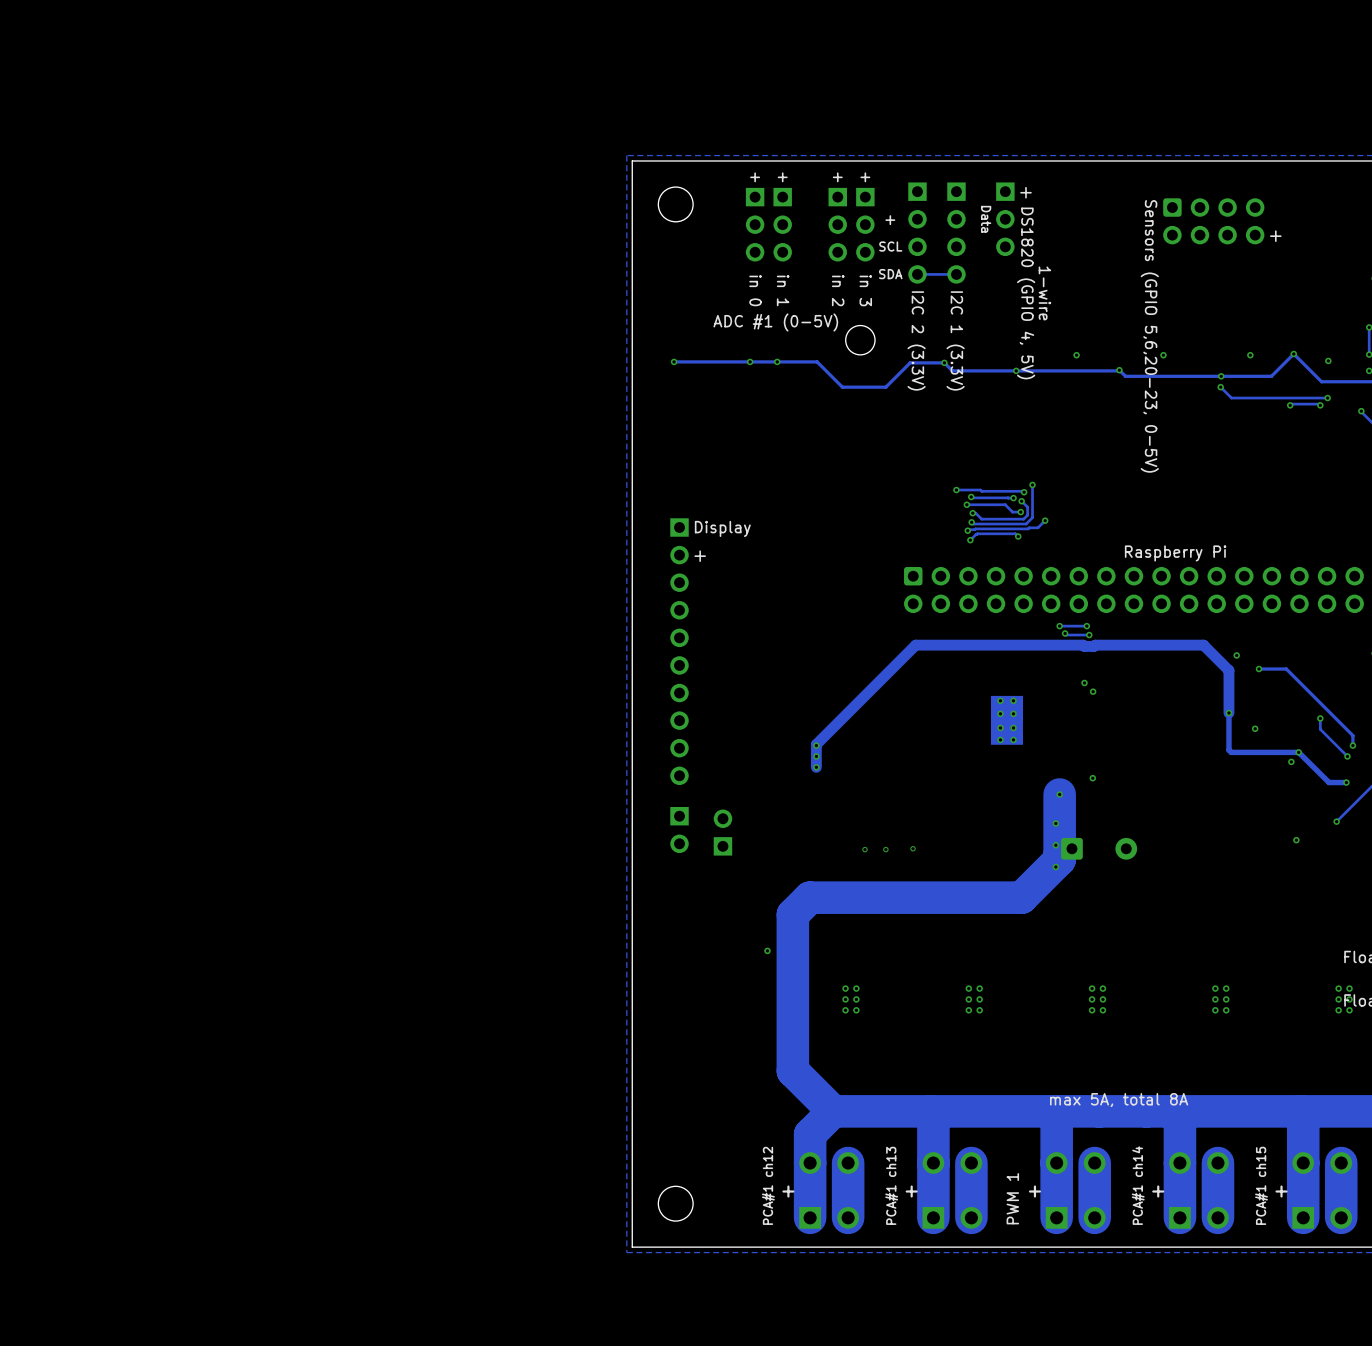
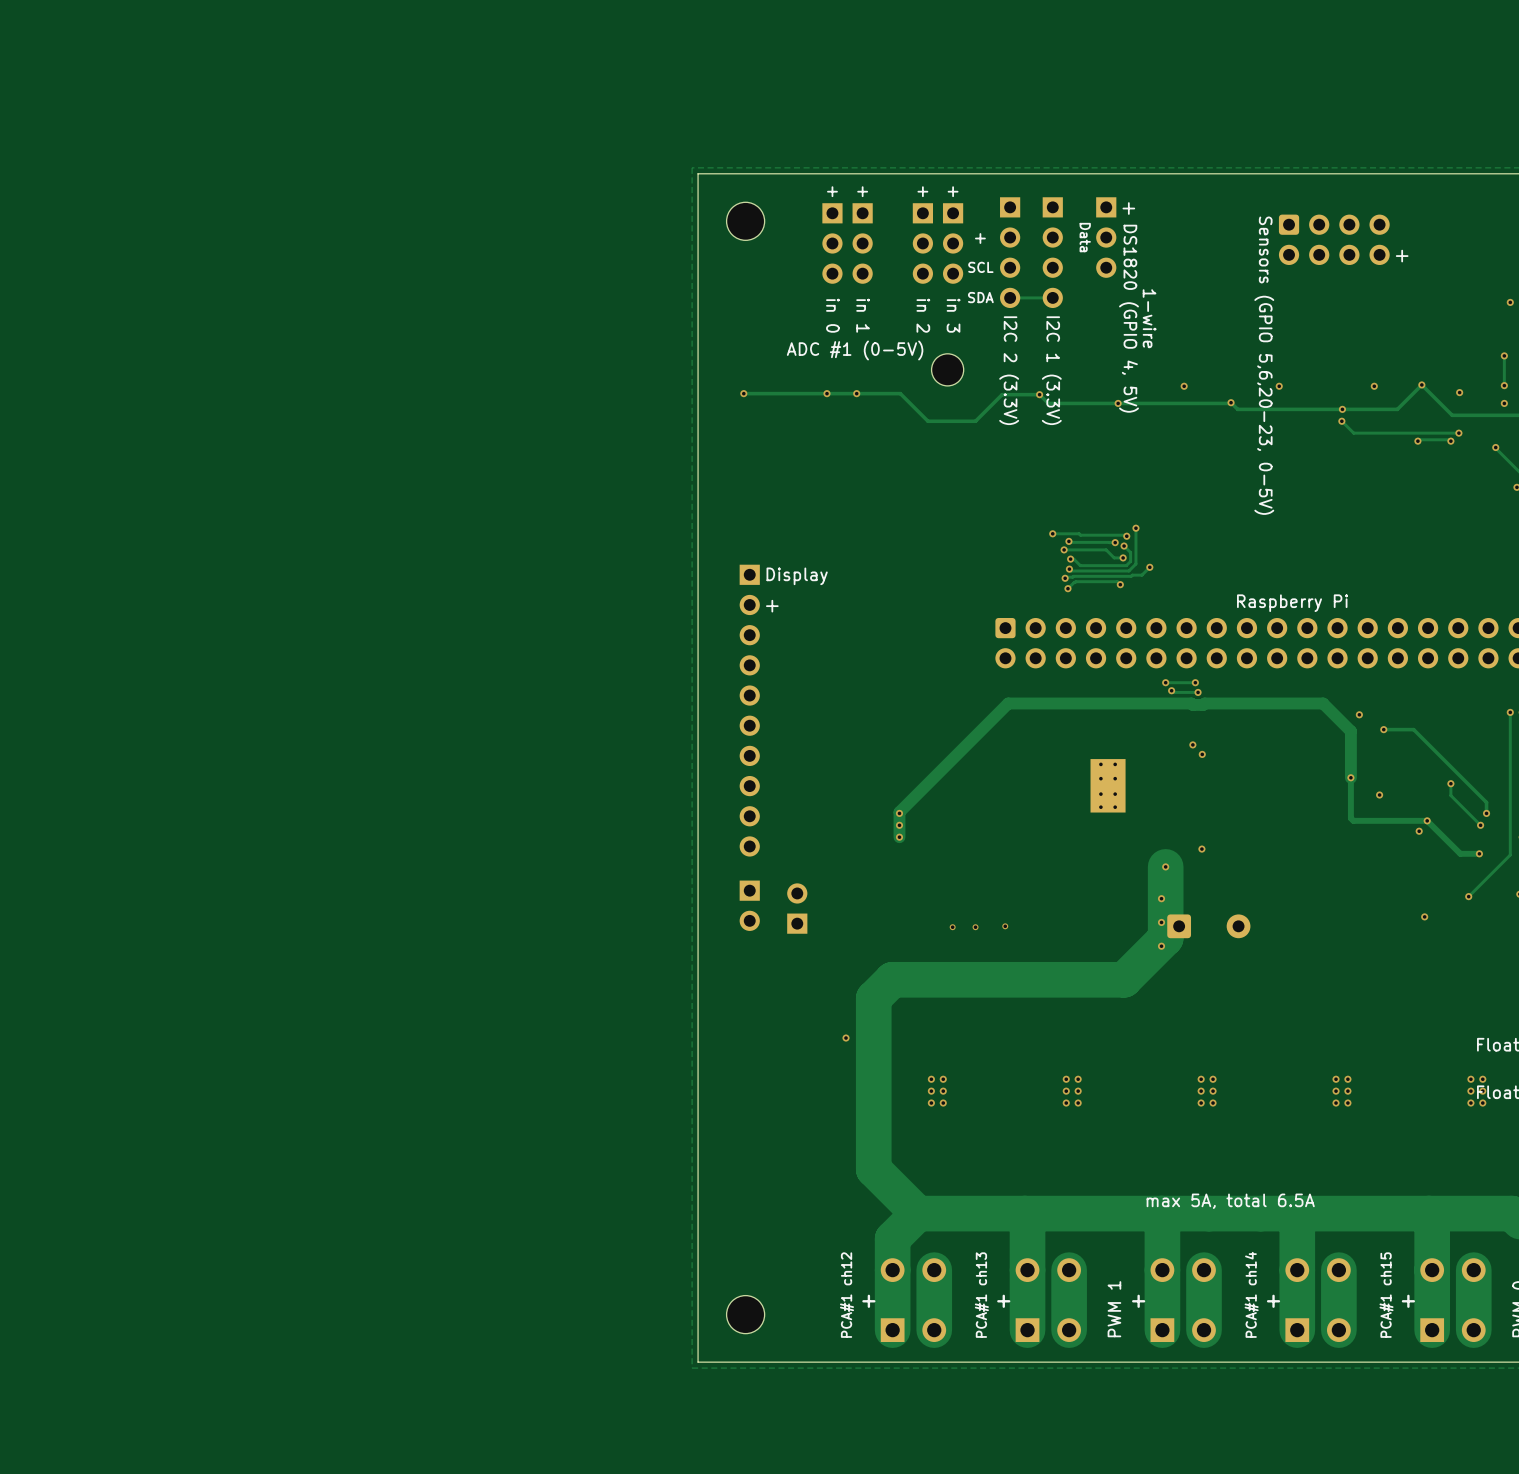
text: max 5A, total 8A (1119, 1100) -> max 5A, total 6.5A (1230, 1201)

